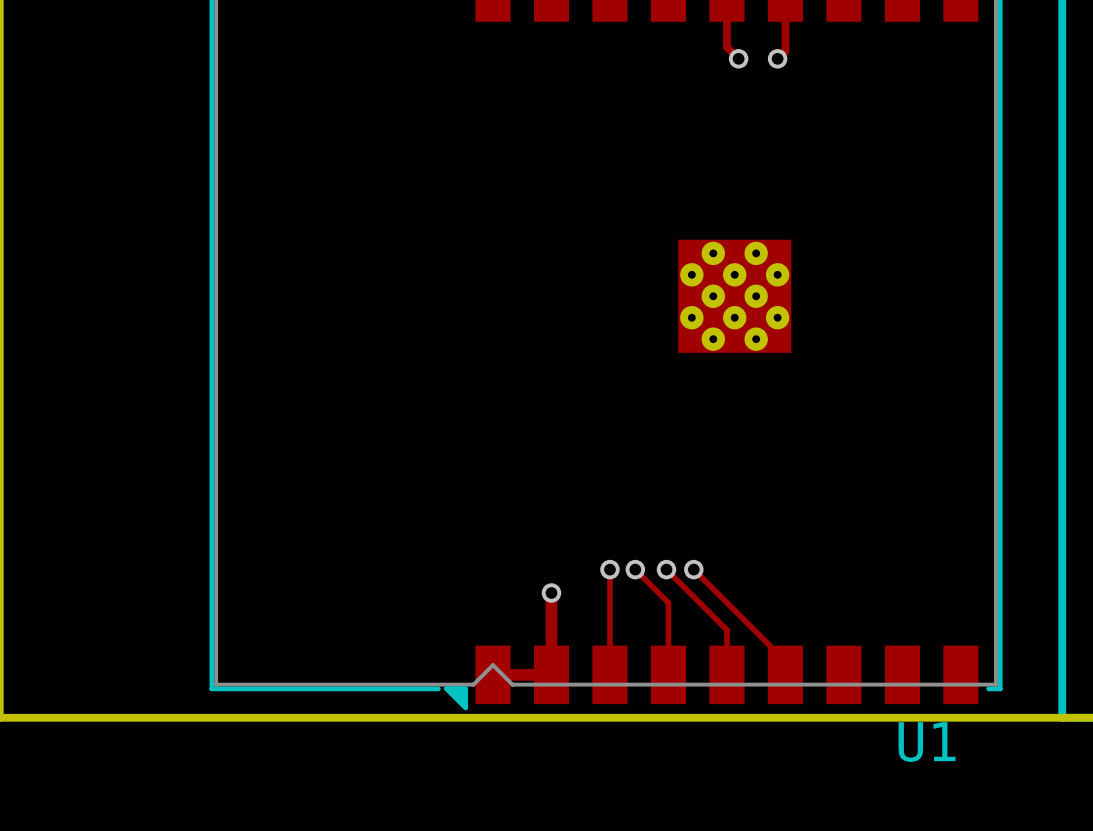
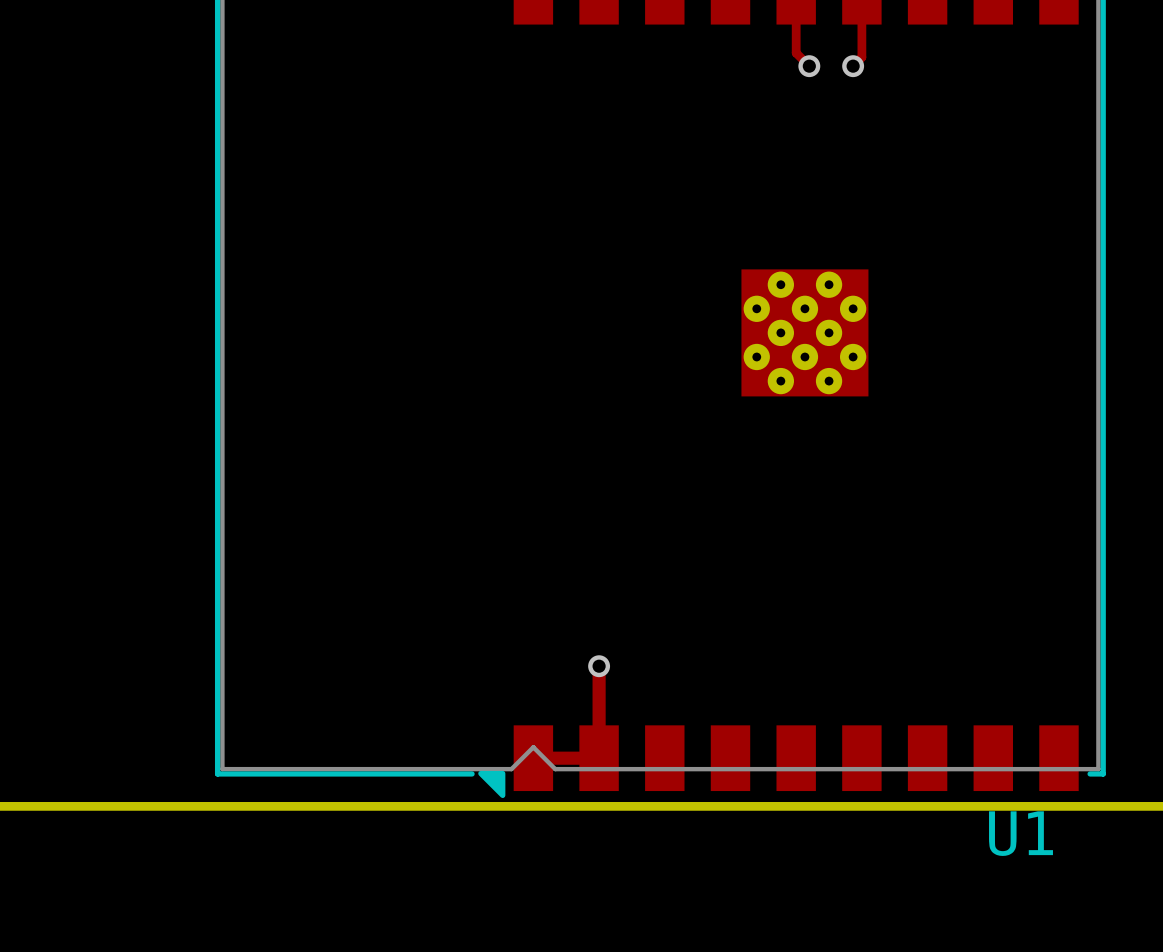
via: (609, 569) -> none
track: (635, 569) (668, 602) (668, 674) -> none
via: (635, 569) -> none
track: (666, 569) (726, 630) (726, 674) -> none
via: (666, 569) -> none
track: (693, 569) (785, 661) (785, 674) -> none
via: (693, 569) -> none
track: (609, 571) (609, 674) -> none

